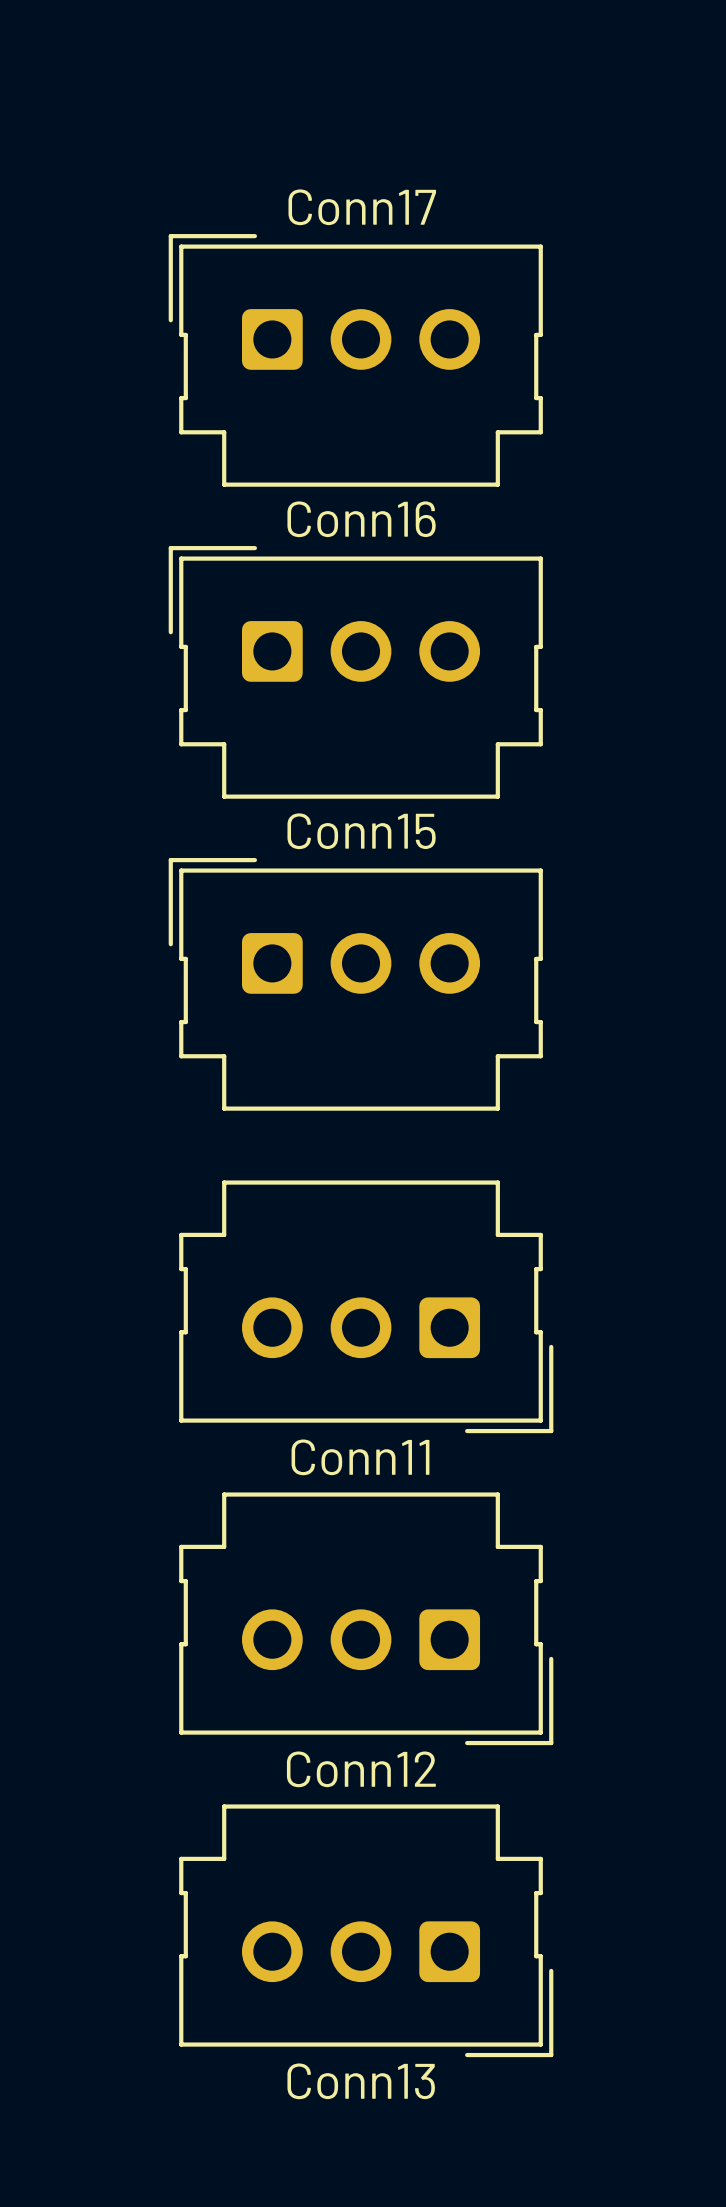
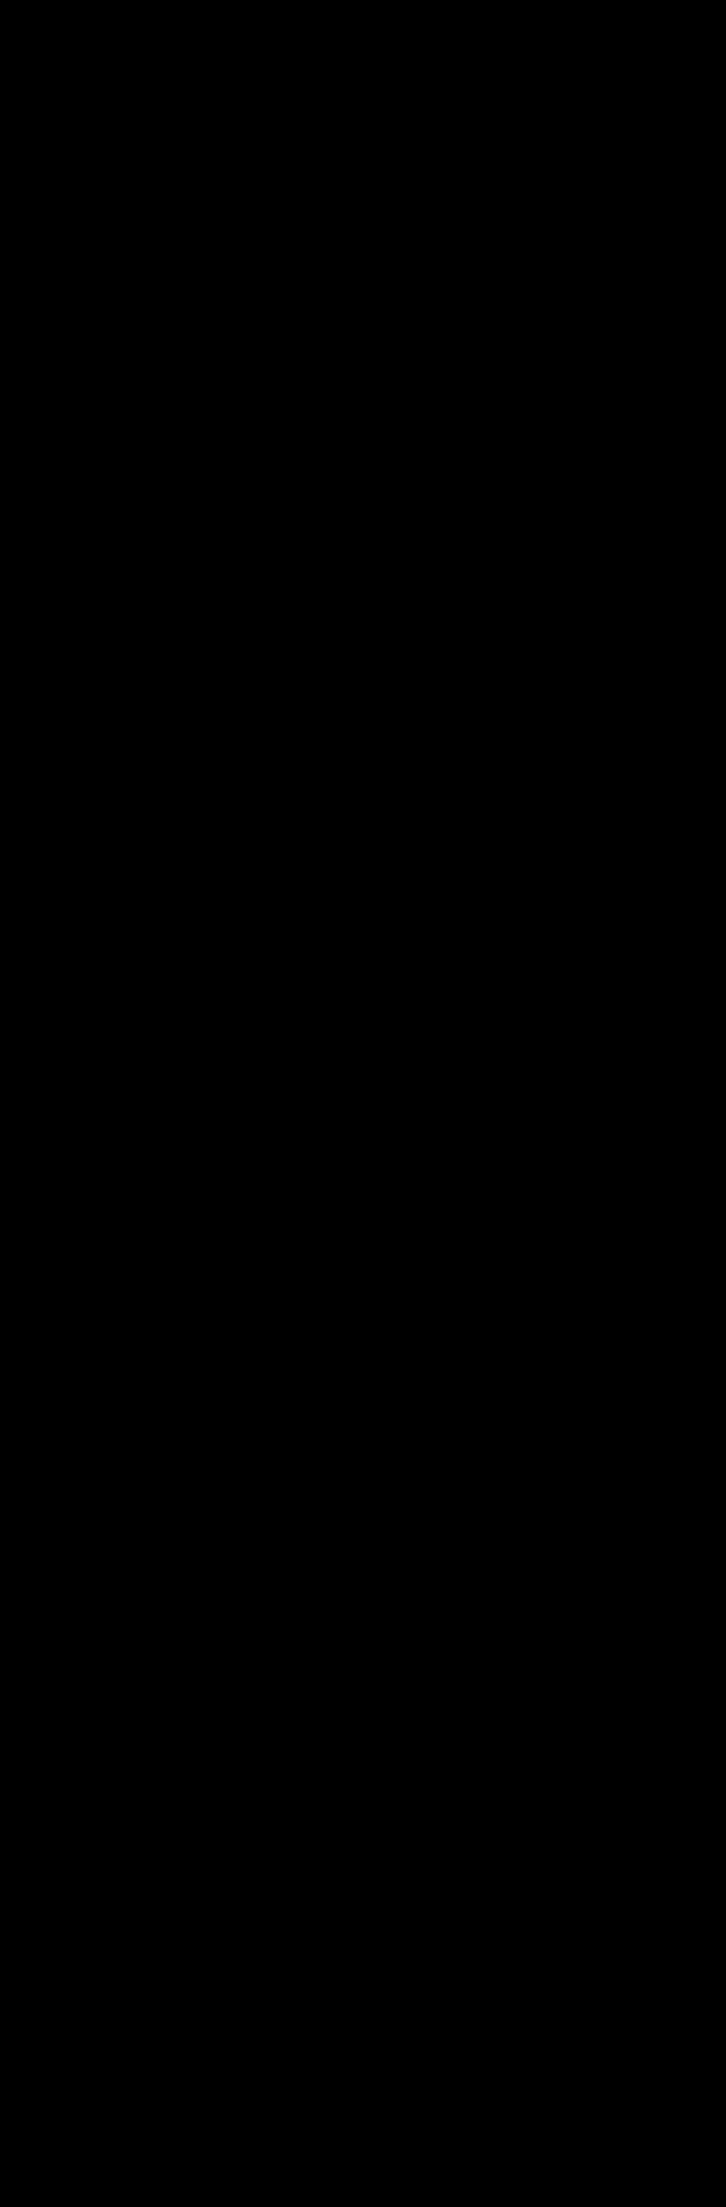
Conn17: (355, 360) -> none
Conn16: (355, 672) -> none
Conn15: (355, 984) -> none
Conn11: (366, 1306) -> none
Conn12: (366, 1618) -> none
Conn13: (366, 1930) -> none

